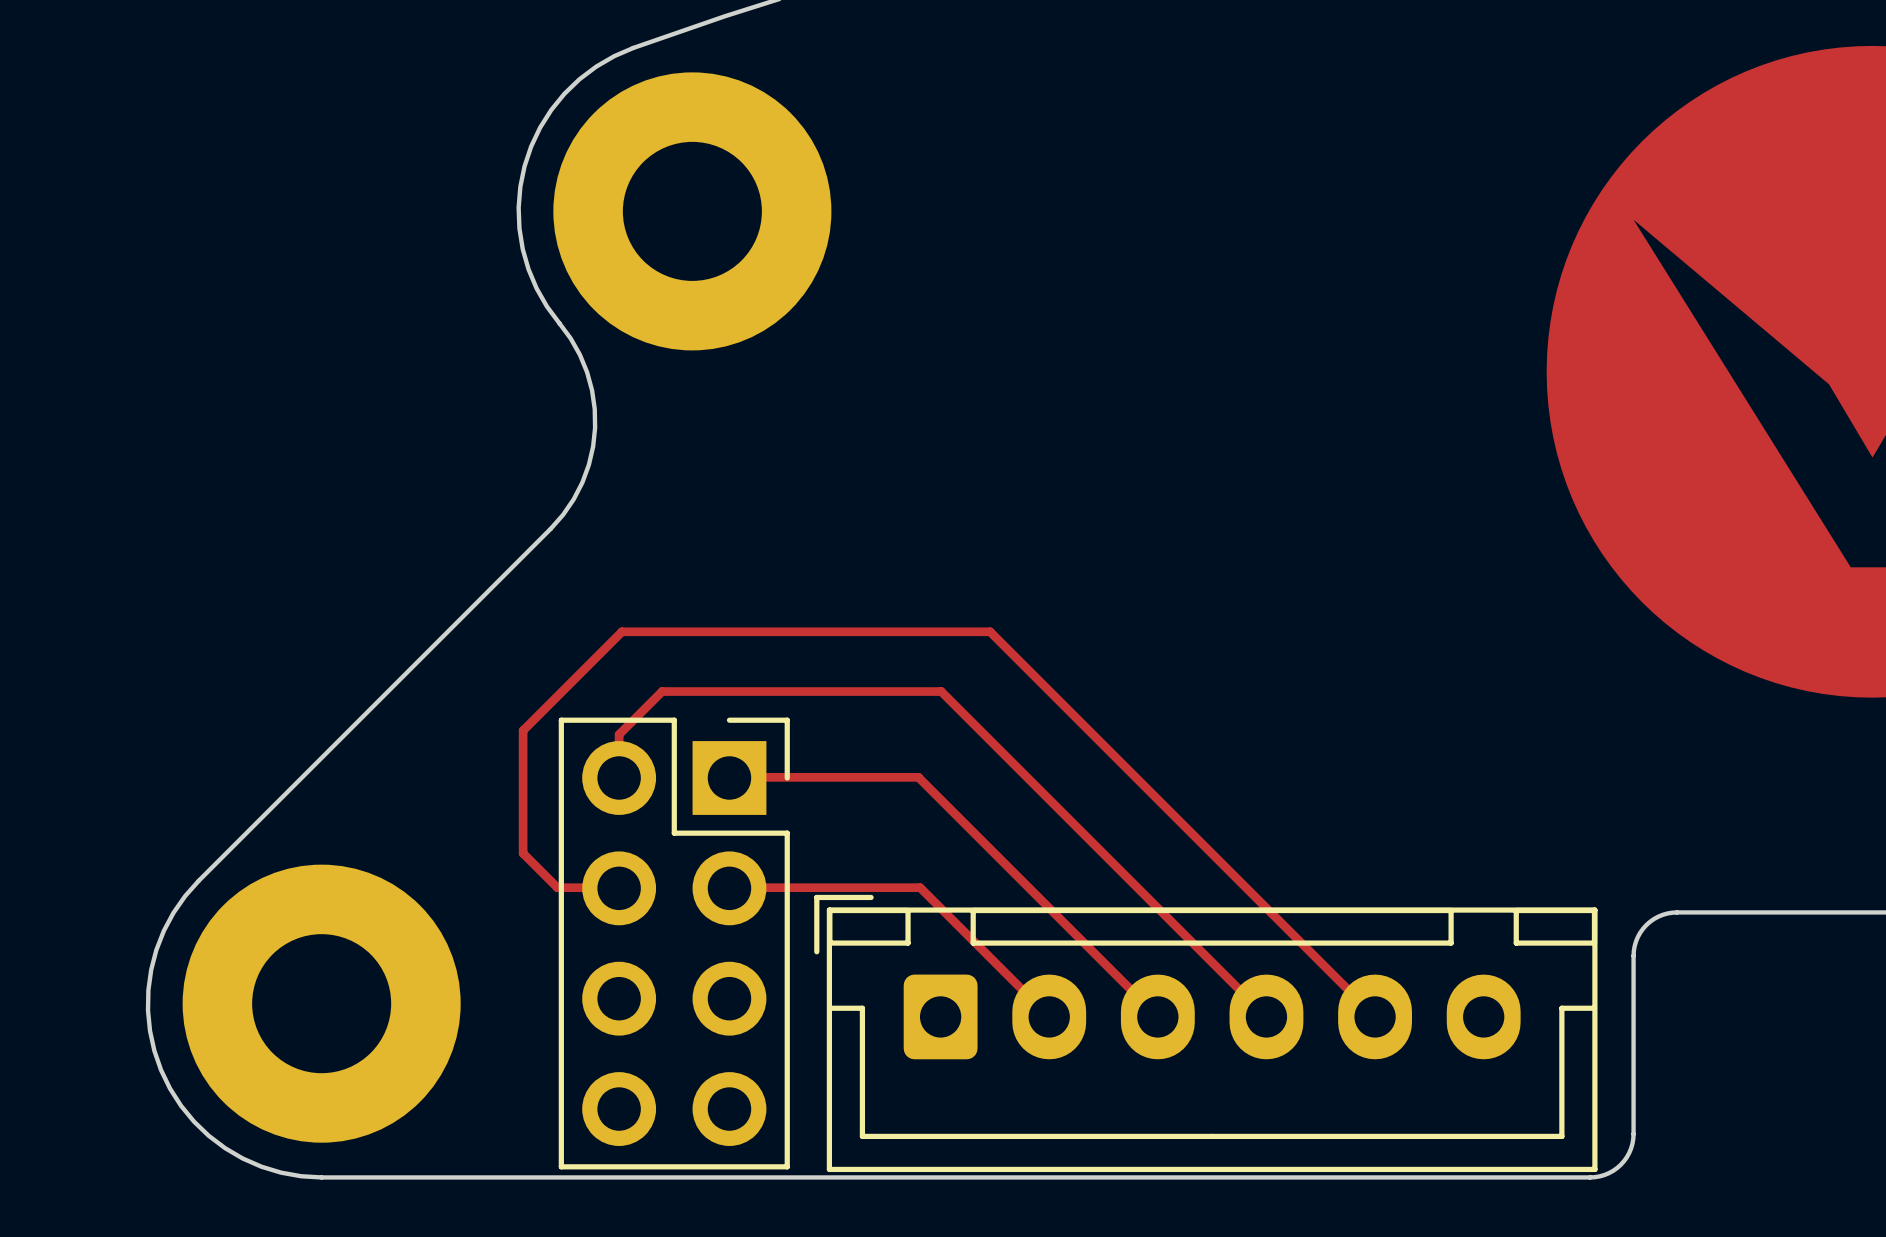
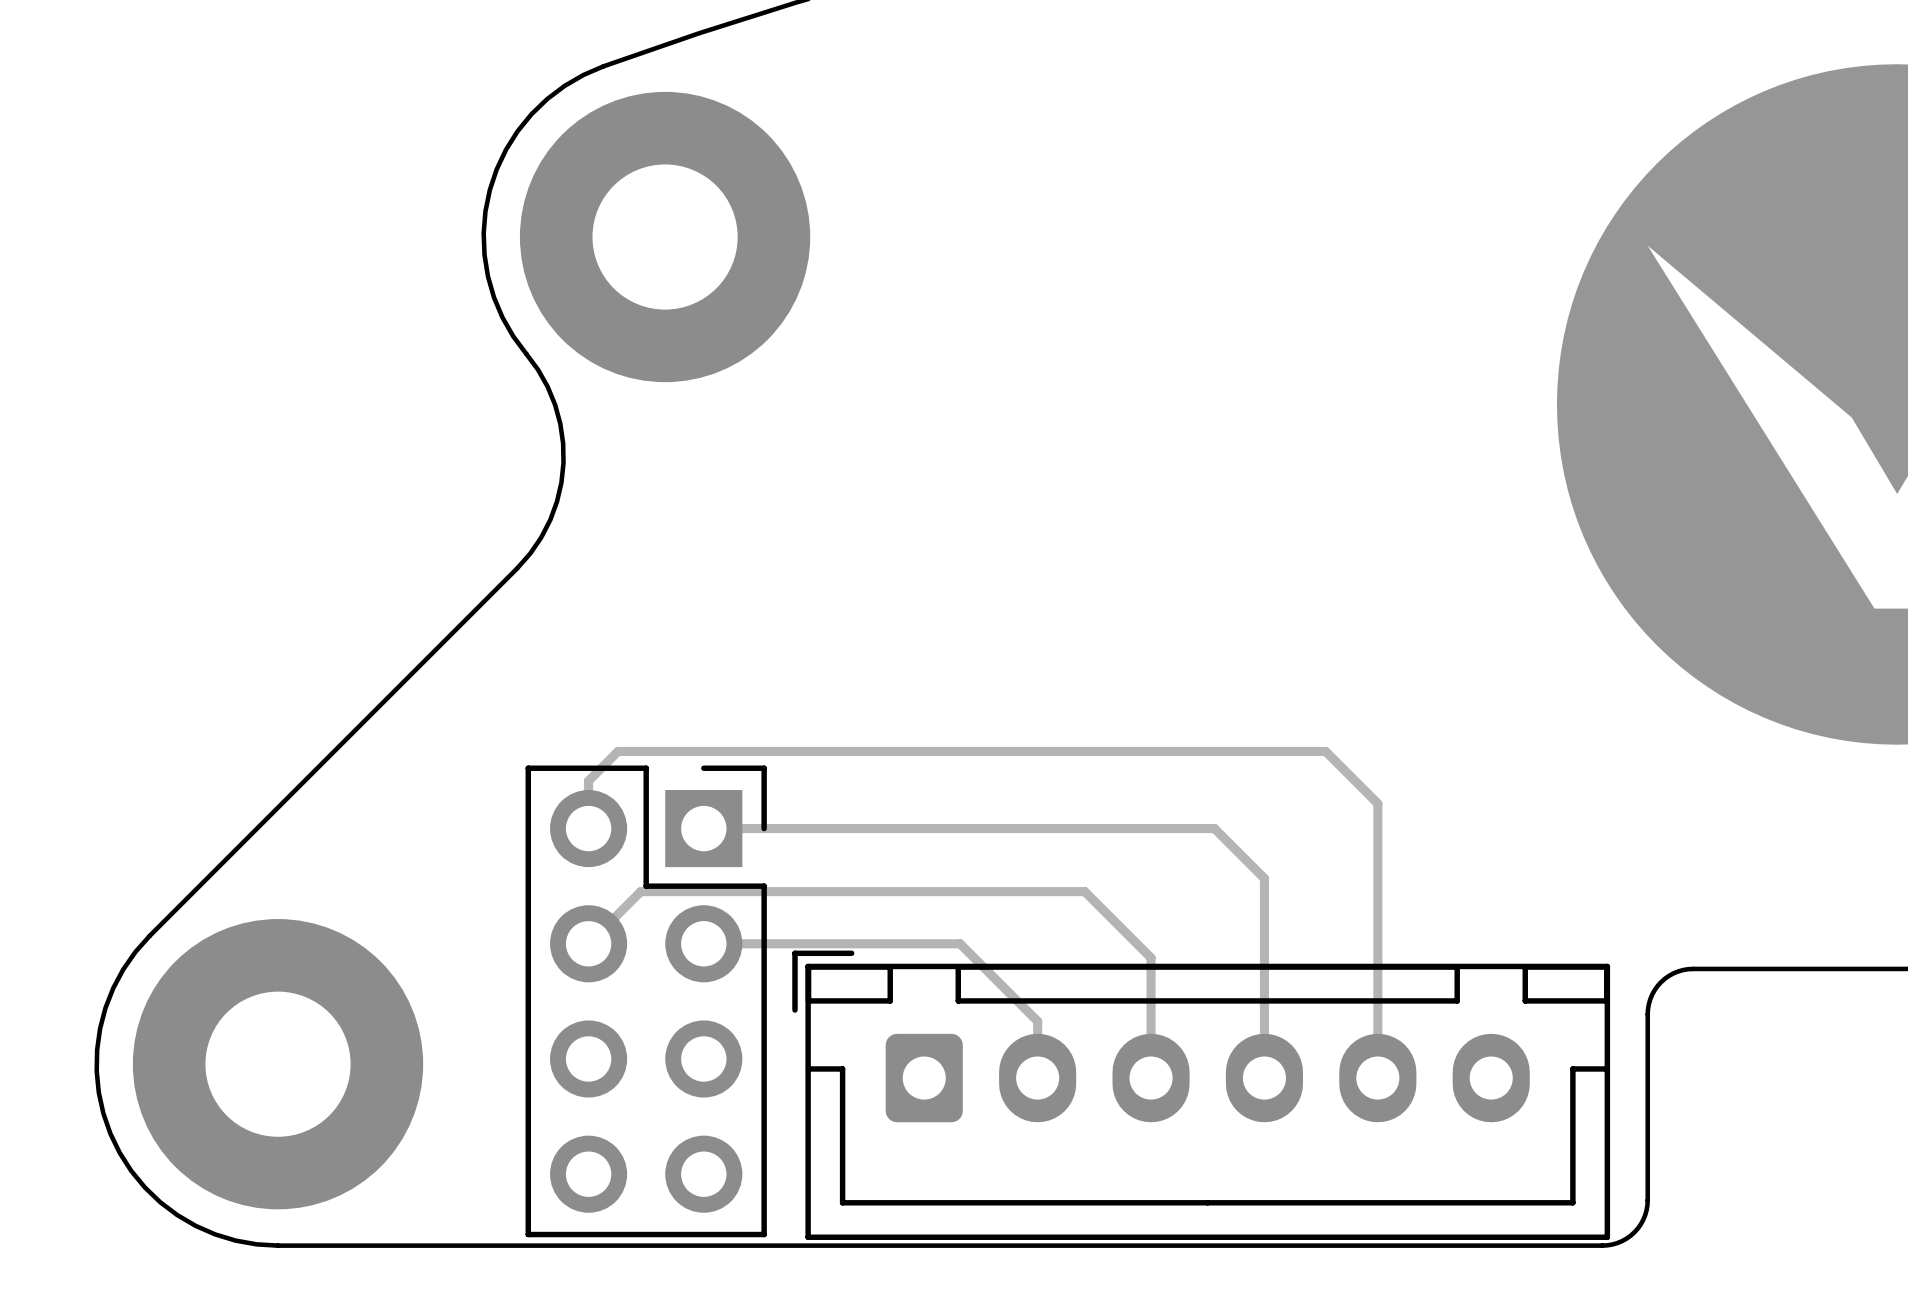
track: (619, 734) (662, 691) (941, 691) (1266, 1016) -> (588, 783) (588, 780) (618, 751) (1325, 751) (1377, 803) (1377, 1078)
track: (729, 777) (918, 777) (1157, 1016) -> (703, 828) (1214, 828) (1264, 878) (1264, 1078)
track: (619, 887) (557, 887) (523, 853) (523, 730) (621, 631) (990, 631) (1374, 1016) -> (588, 943) (640, 891) (1084, 891) (1151, 957) (1151, 1078)
track: (729, 887) (920, 887) (1048, 1016) -> (703, 943) (960, 943) (1037, 1021) (1037, 1078)

